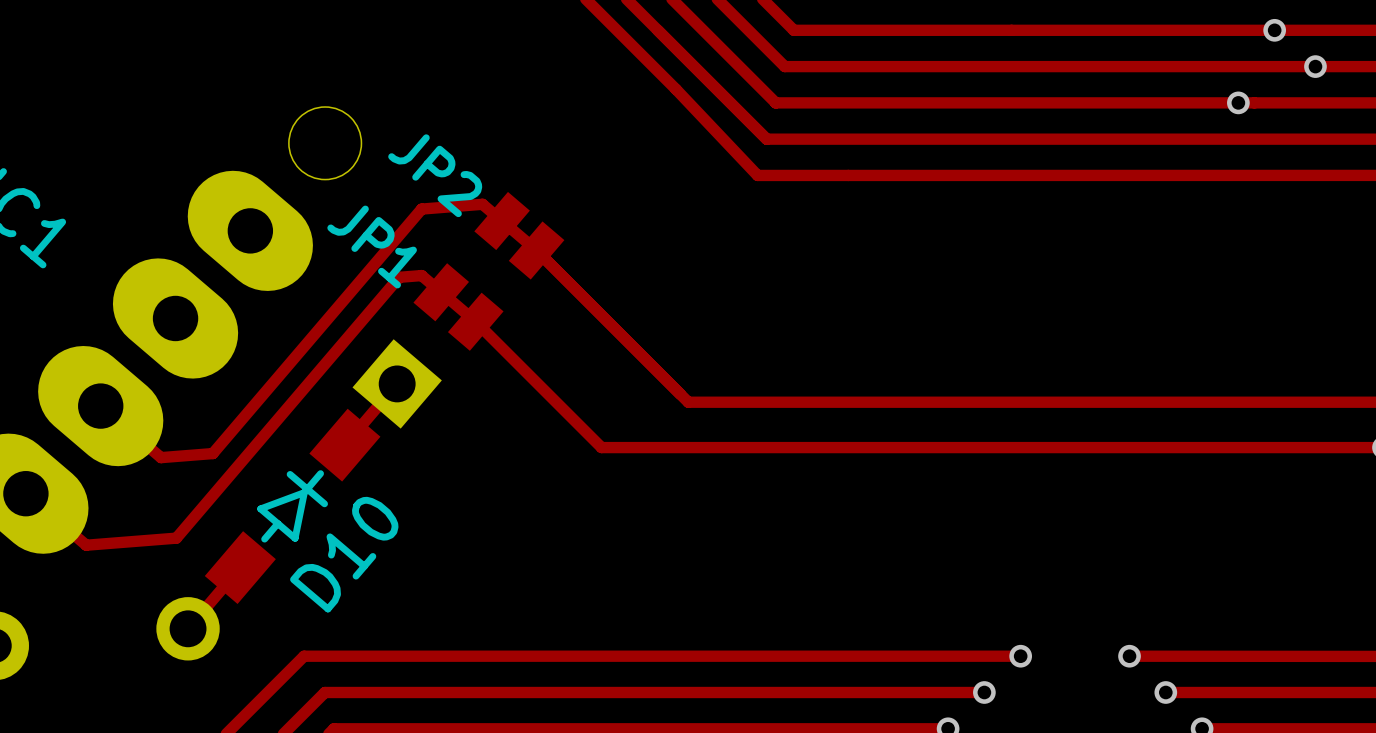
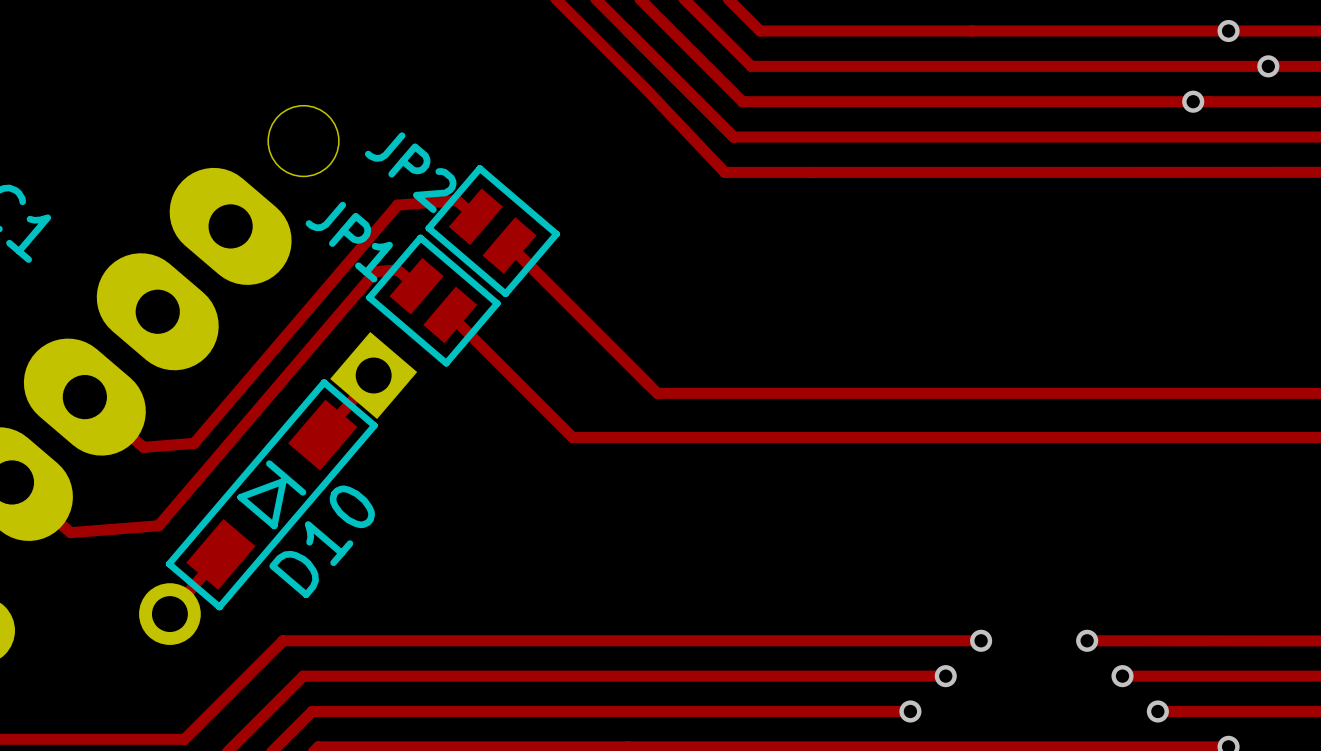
JP2 footprint: [474, 191, 565, 280] -> [425, 165, 560, 298]
JP1 footprint: [413, 263, 504, 351] -> [366, 234, 501, 367]
D10 footprint: [156, 339, 442, 661] -> [139, 331, 418, 645]

